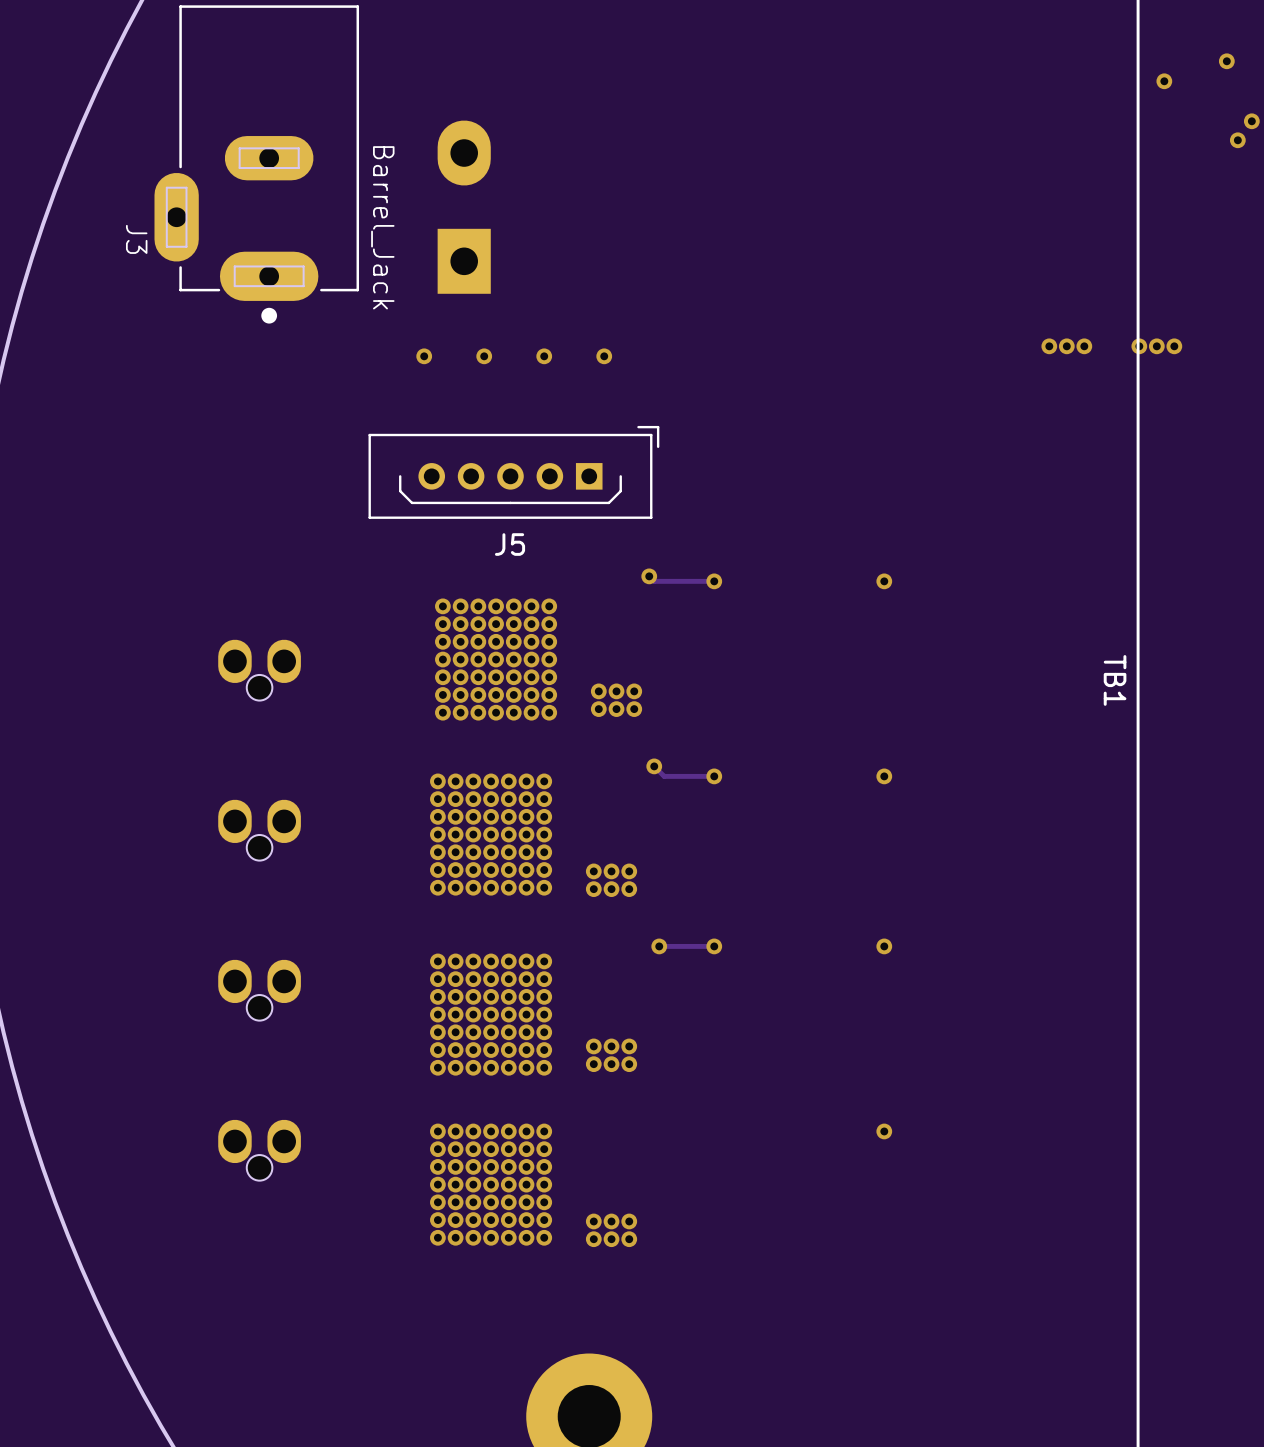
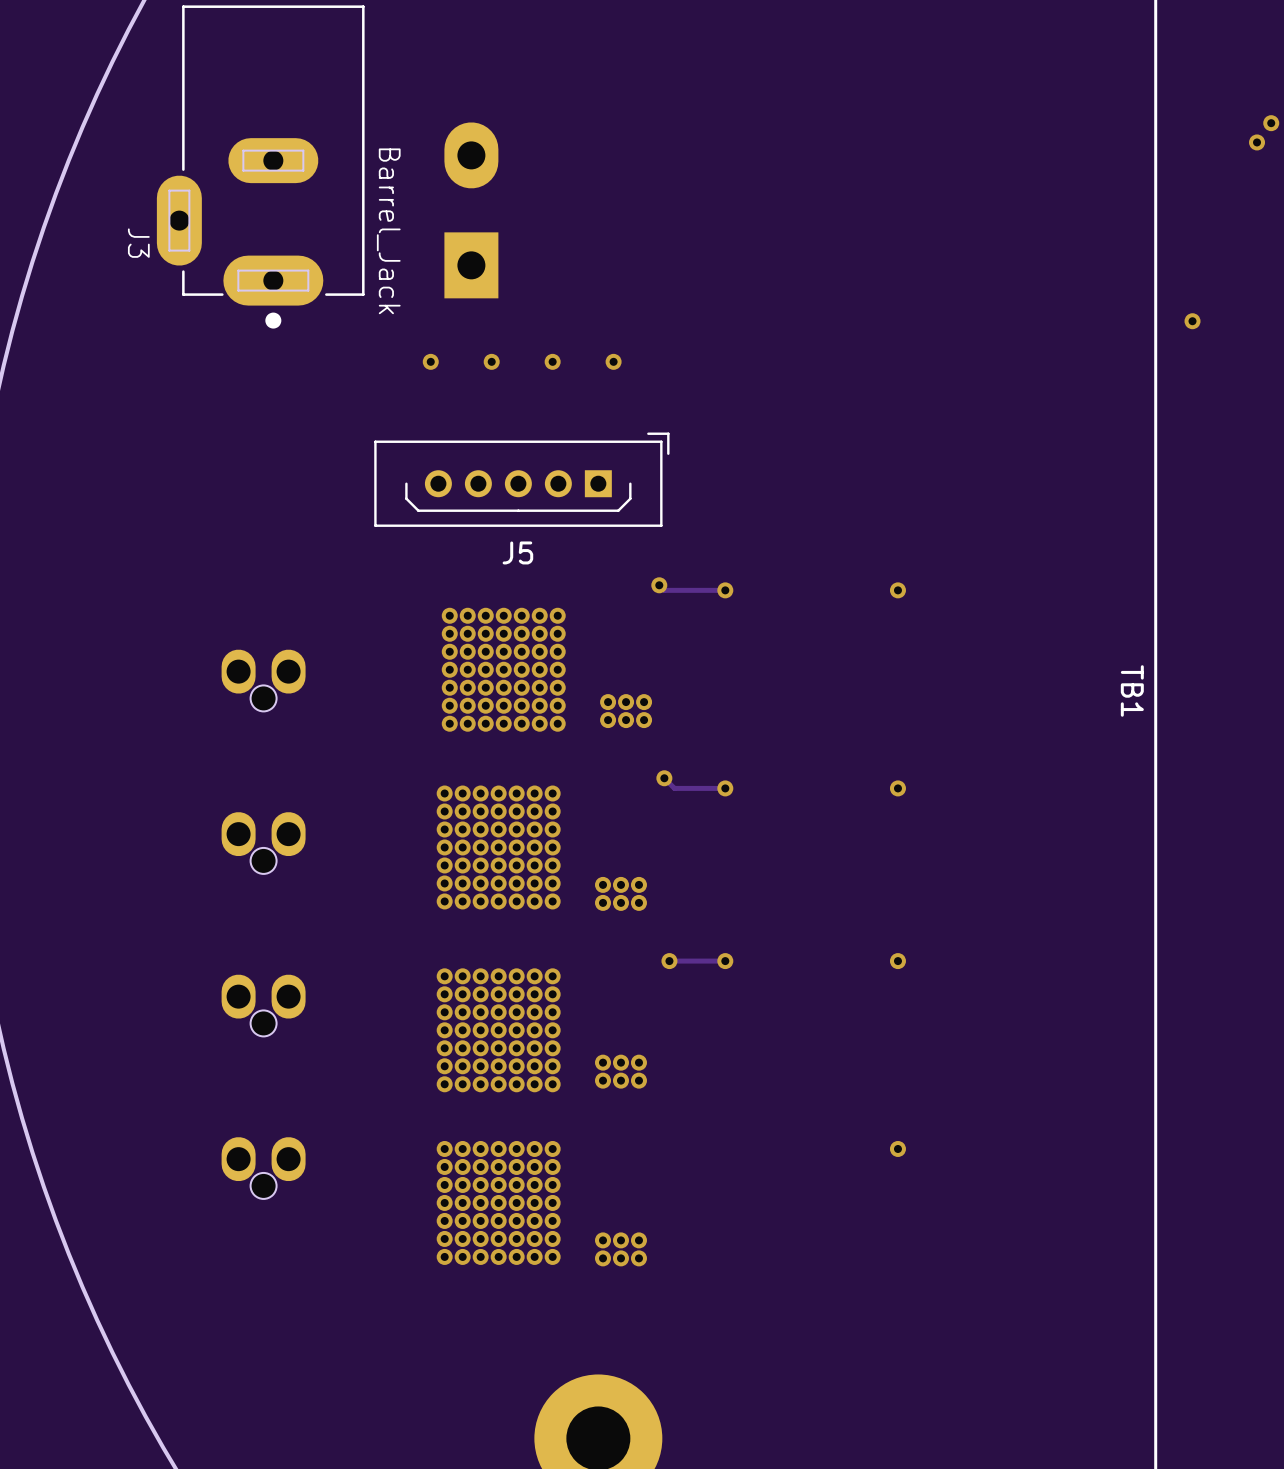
via: (1226, 61) -> none
via: (1164, 81) -> none
via: none -> (1192, 321)
via: (1049, 346) -> none
via: (1066, 346) -> none
via: (1084, 346) -> none
via: (1139, 346) -> none
via: (1156, 346) -> none
via: (1174, 346) -> none

